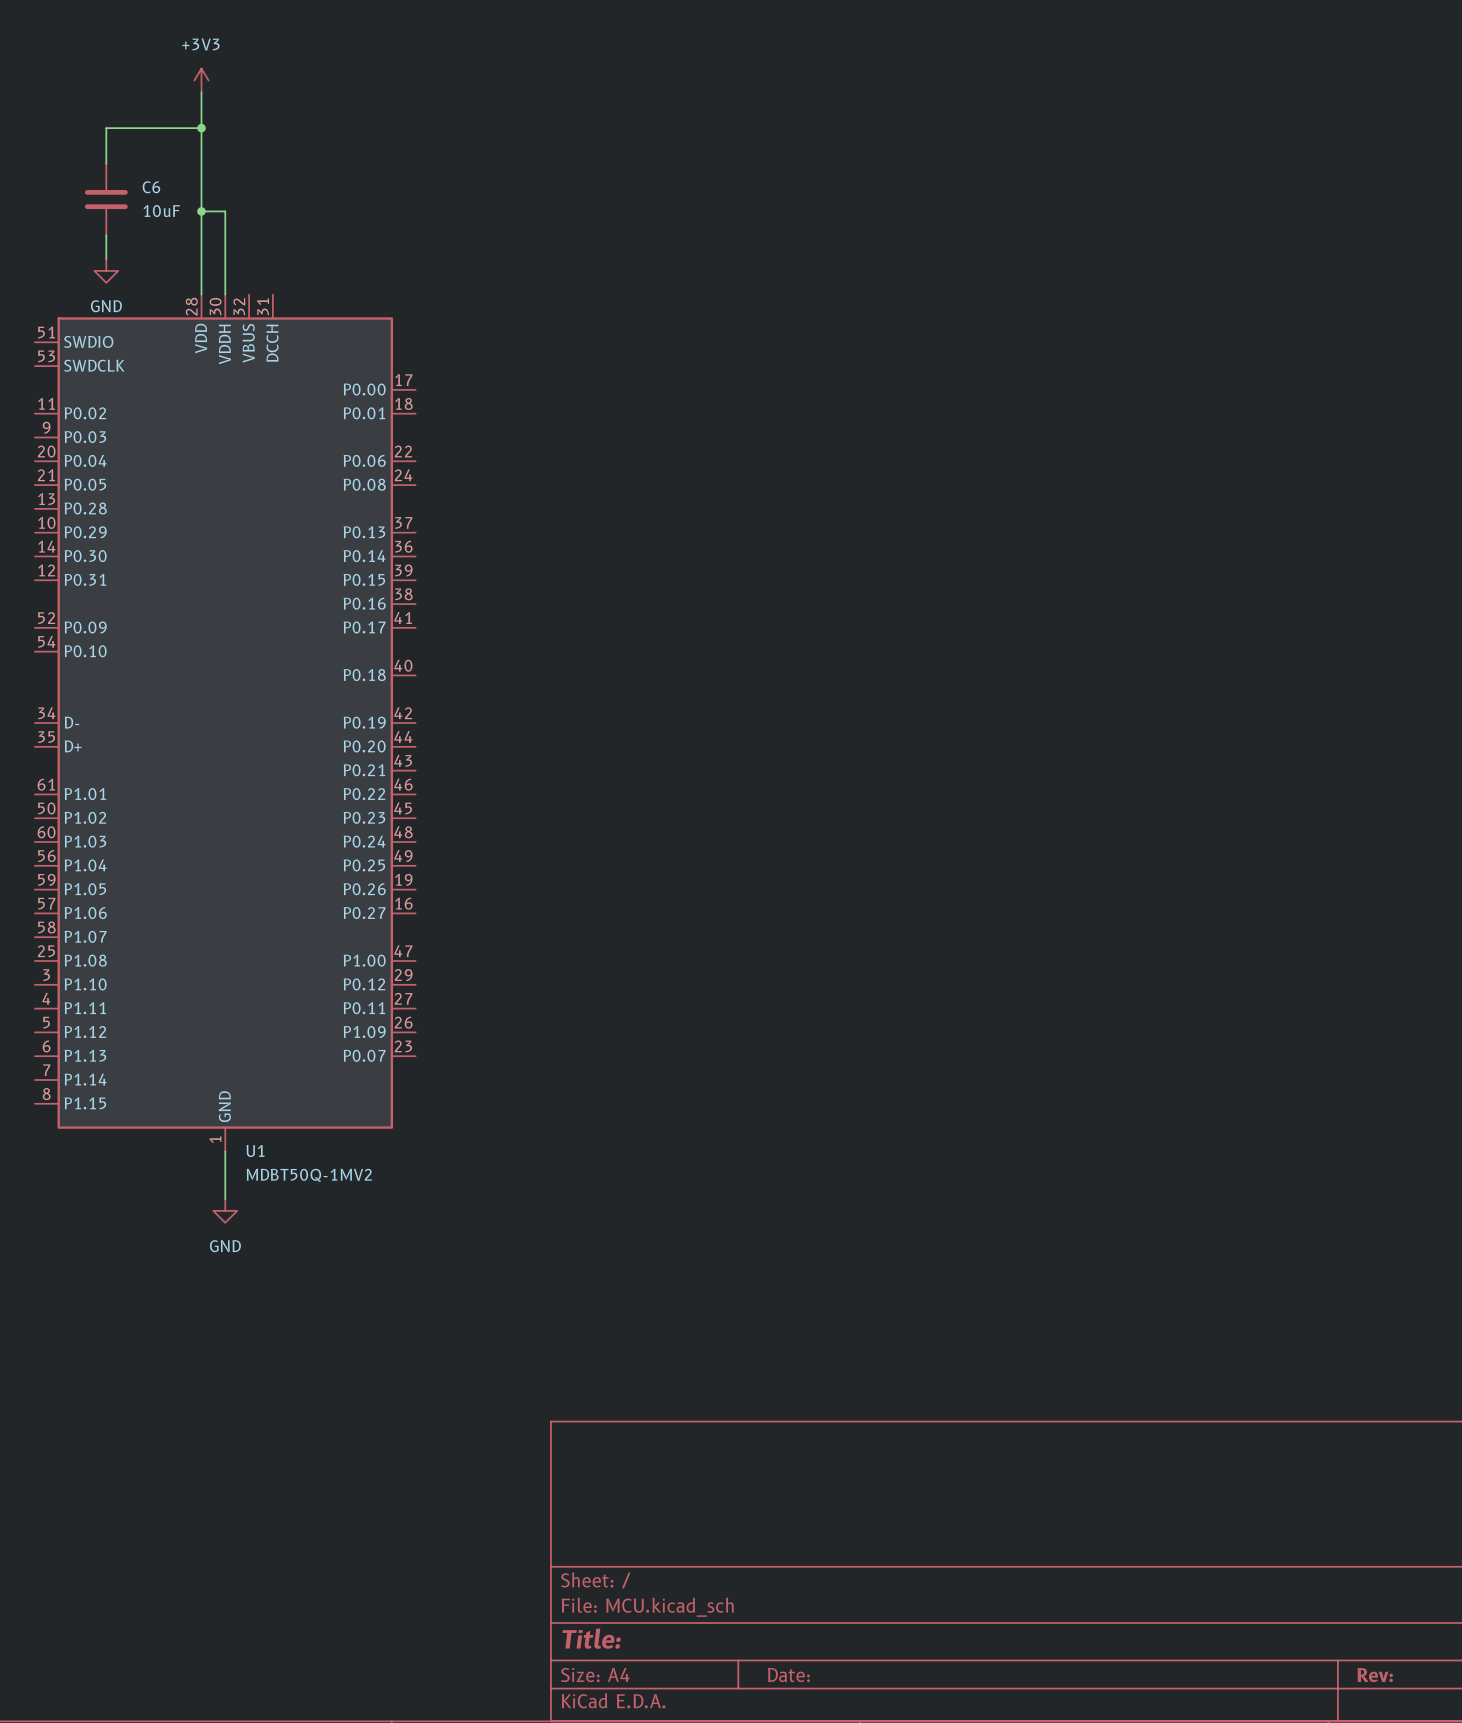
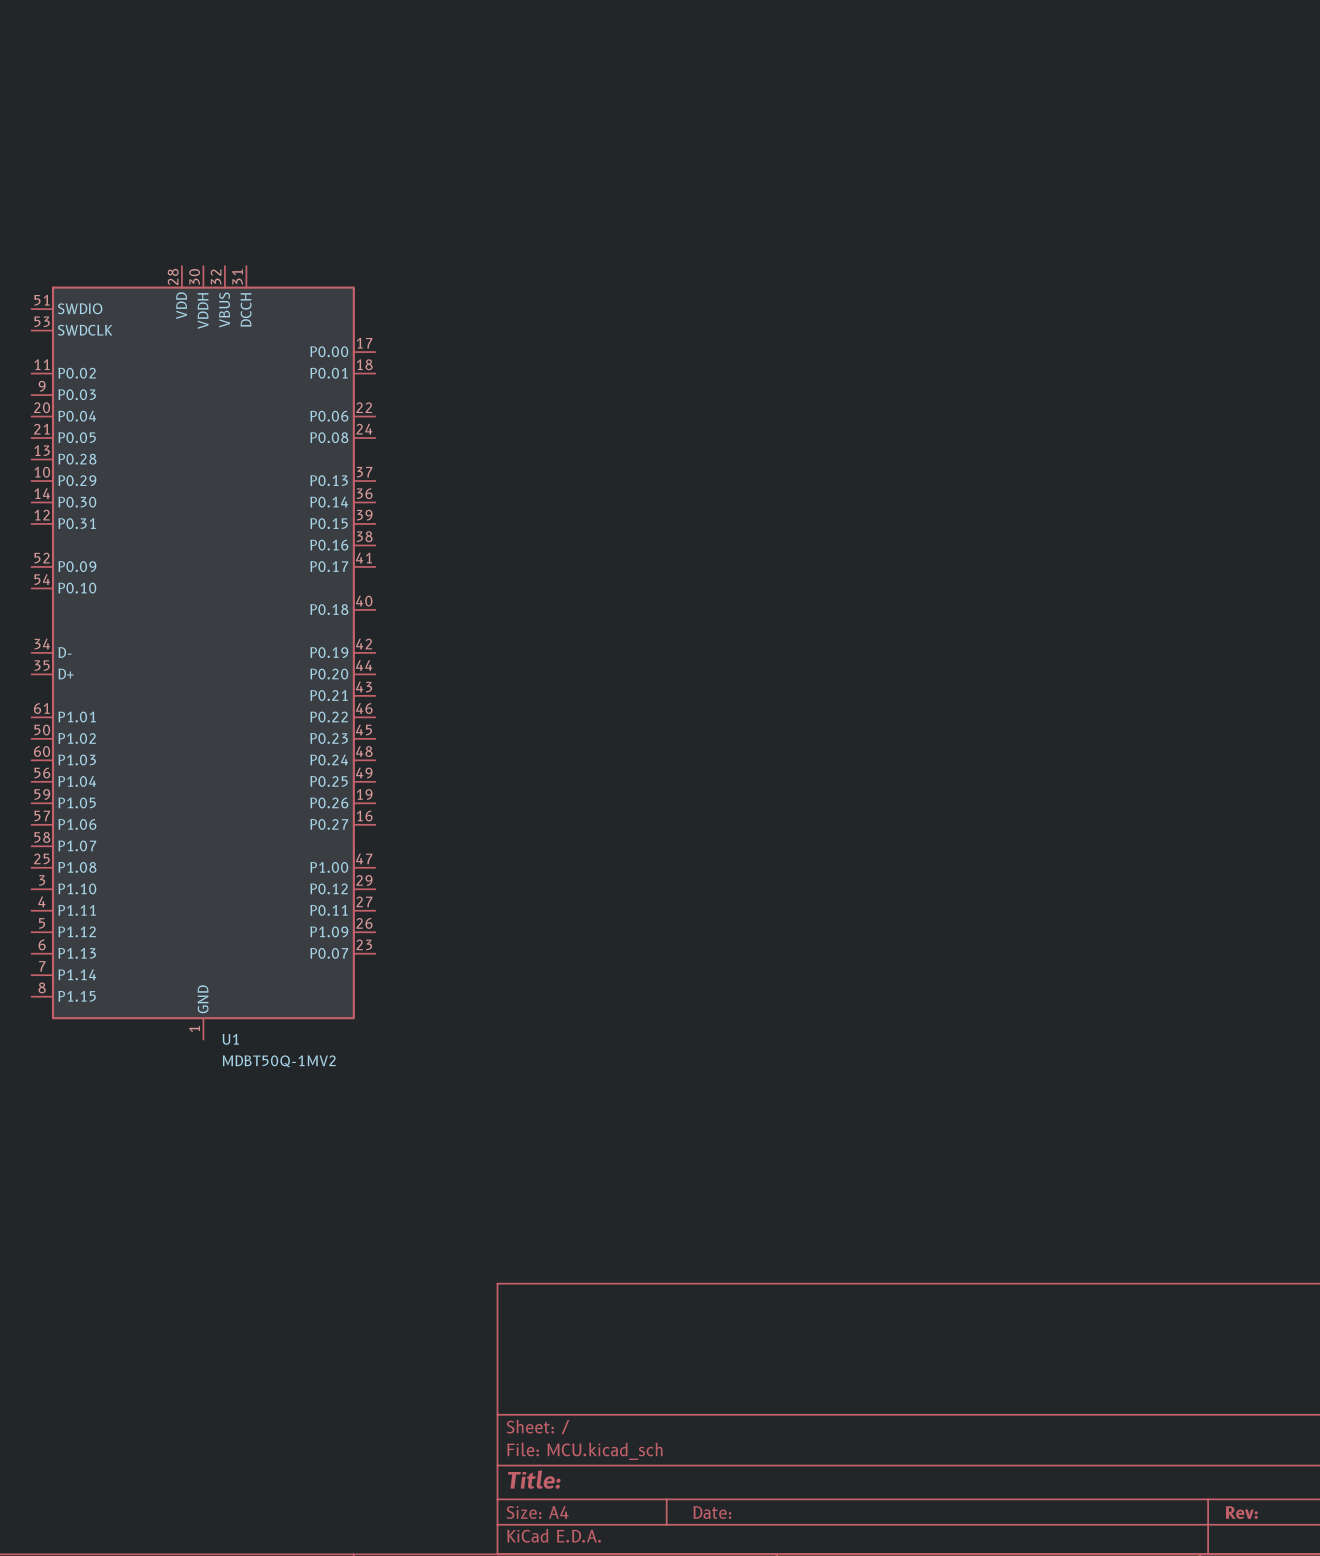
power symbol: +3V3 (201, 80) -> none
wire: (201, 92) (201, 294) -> none
wire: (201, 128) (106, 128) (106, 163) -> none
junction: (201, 128) -> none
C6: 10uF (106, 199) -> none
wire: (201, 211) (225, 211) (225, 294) -> none
junction: (201, 211) -> none
wire: (106, 235) (106, 259) -> none
power symbol: GND (106, 270) -> none
wire: (225, 1151) (225, 1198) -> none
power symbol: GND (225, 1210) -> none

